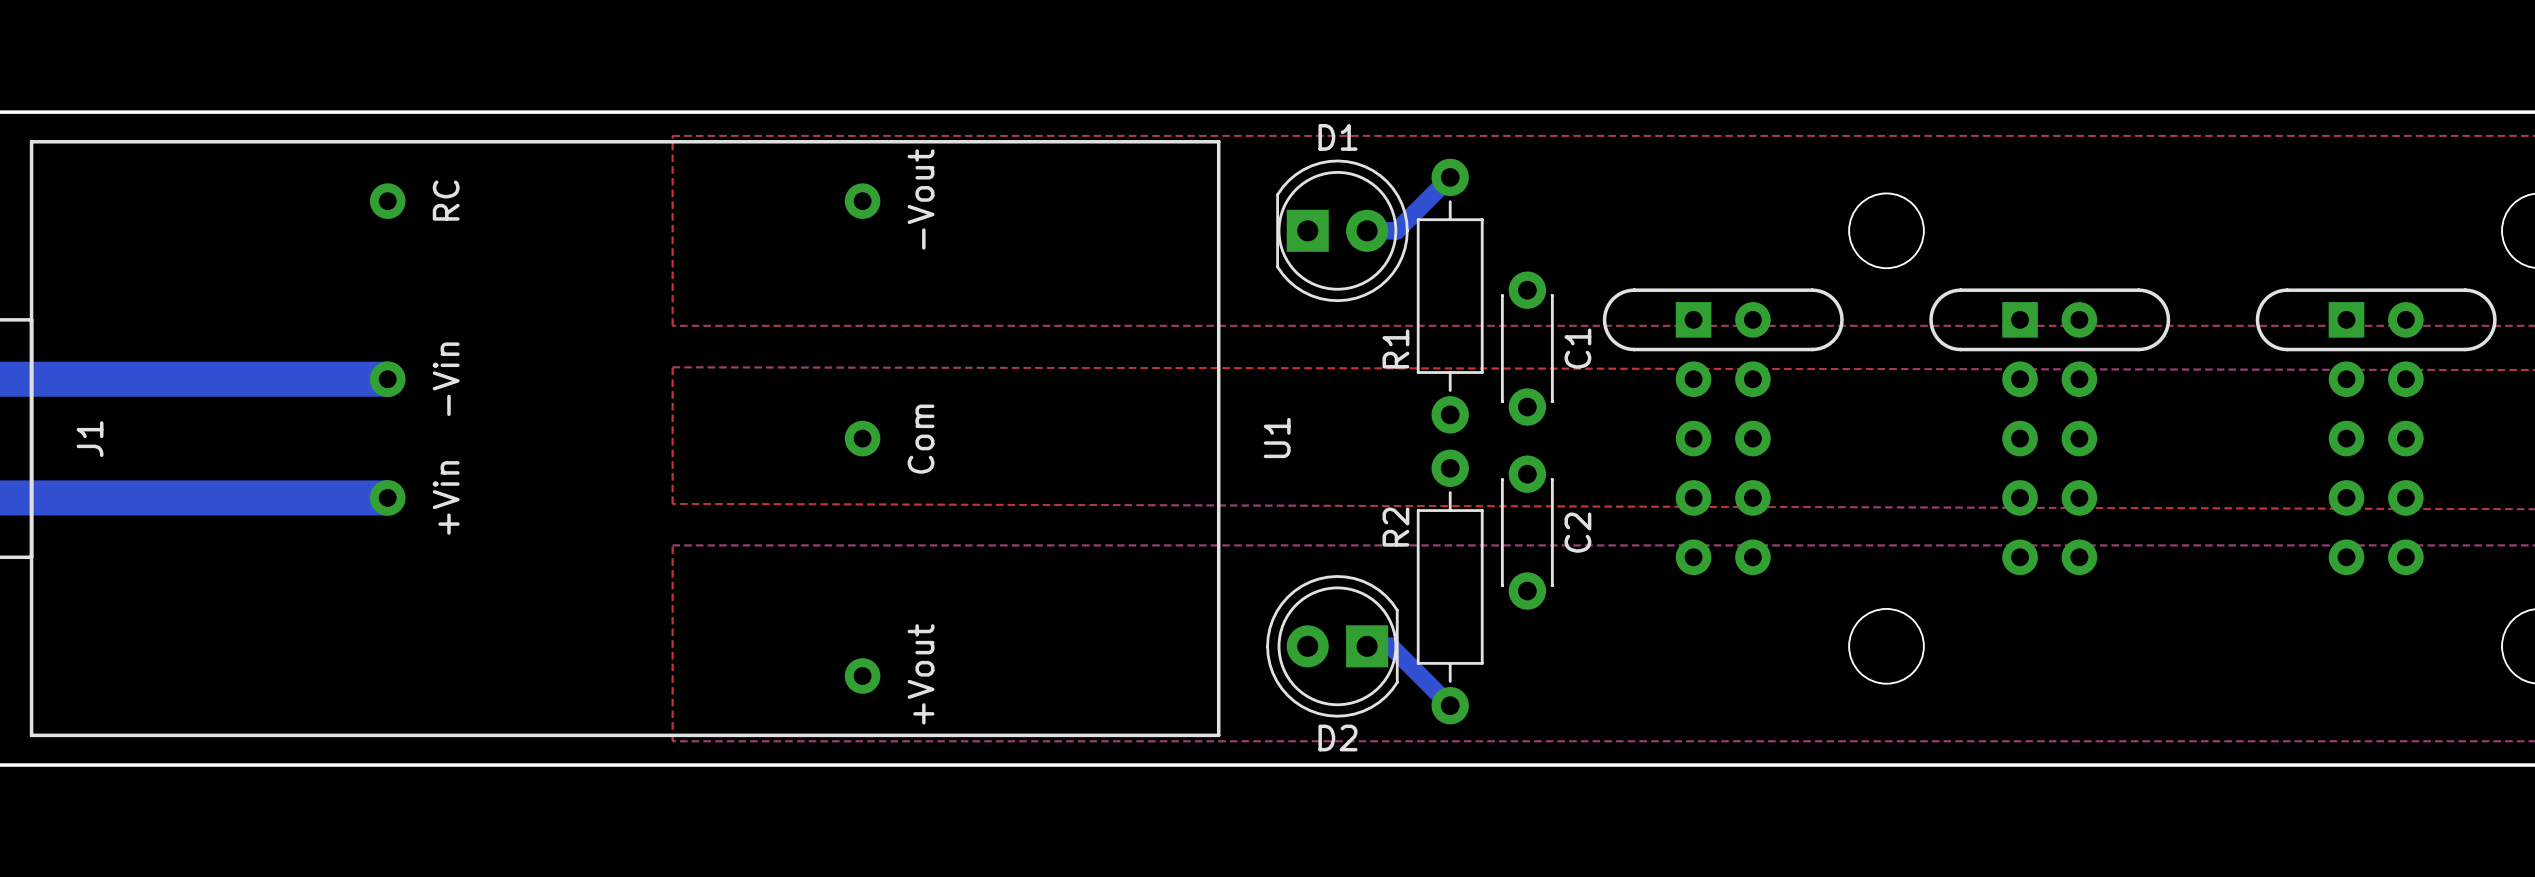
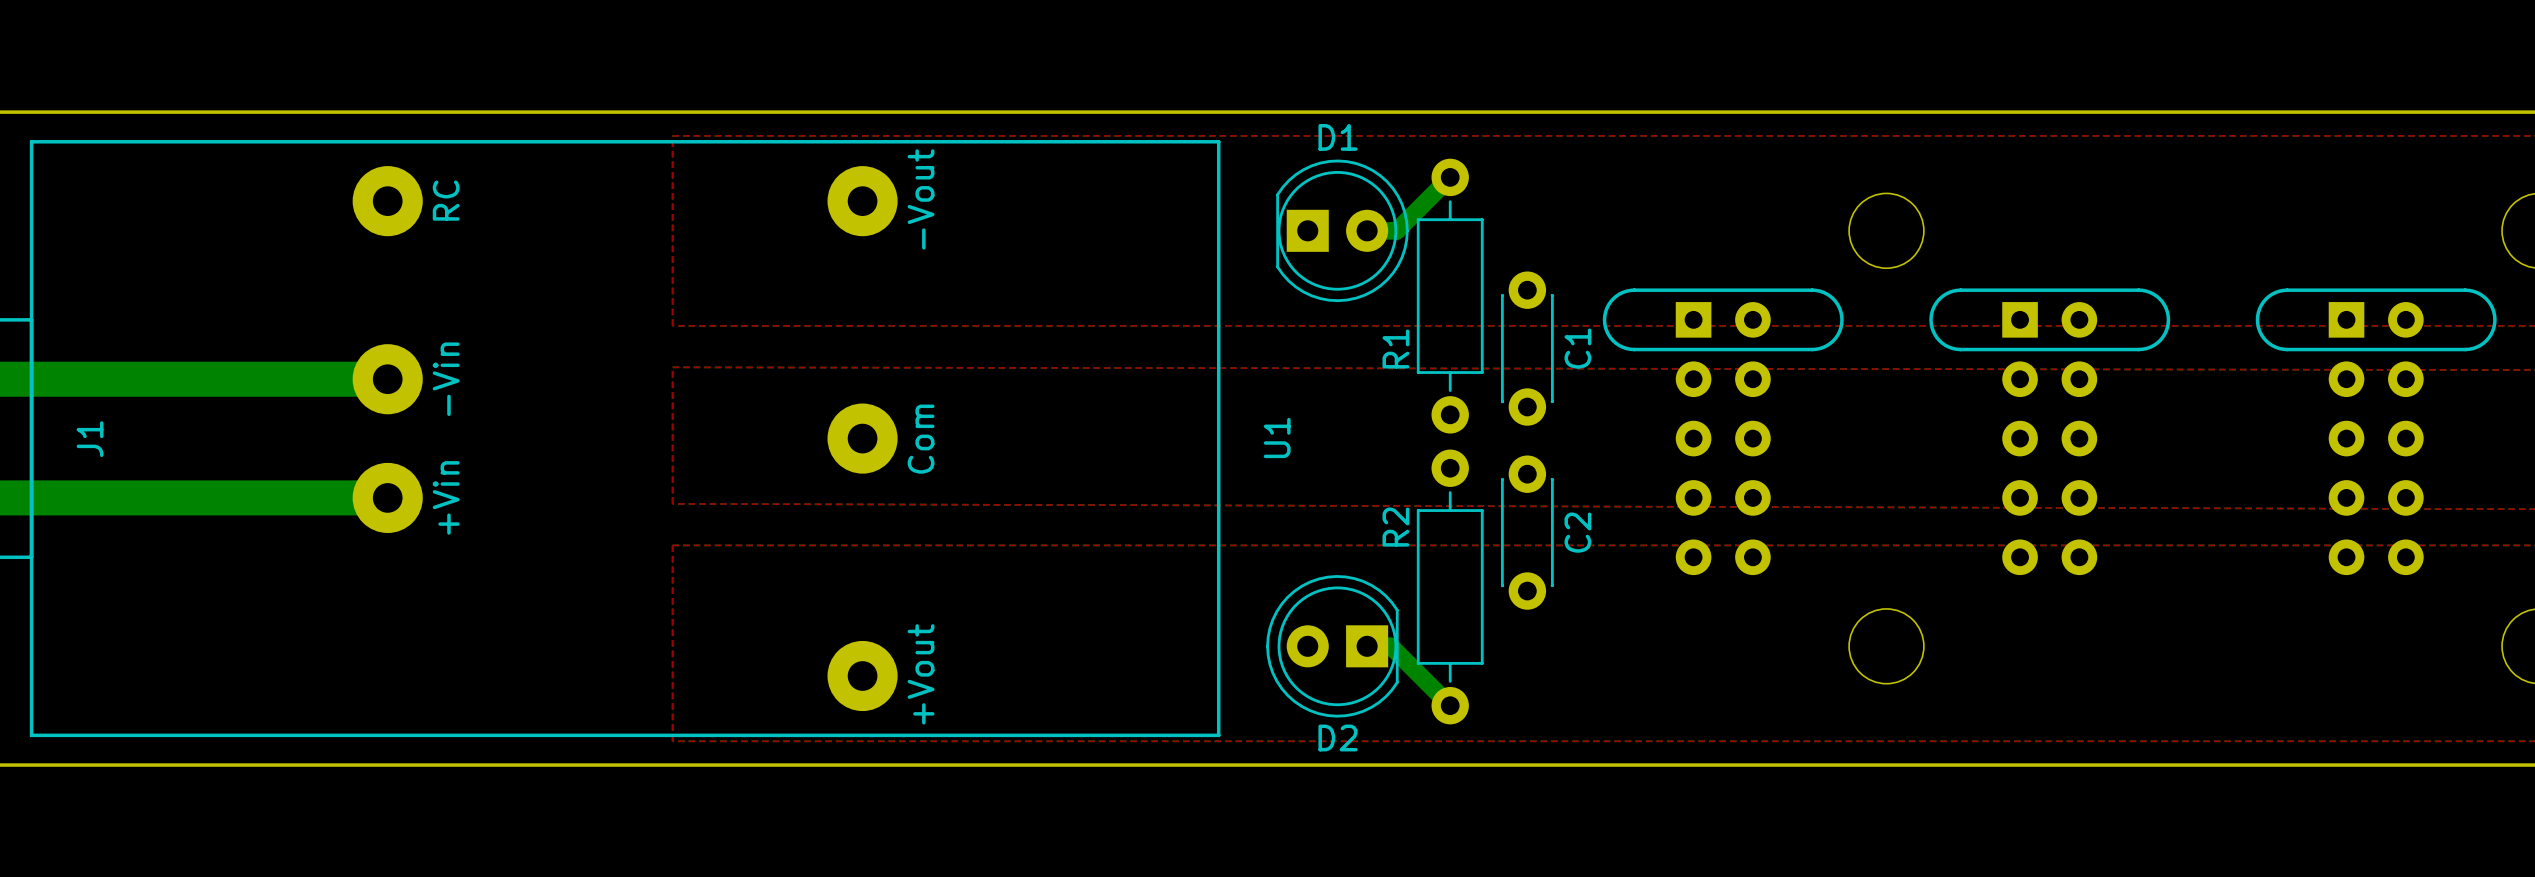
U1 footprint: [29, 140, 1221, 738] -> [29, 140, 1221, 738]

